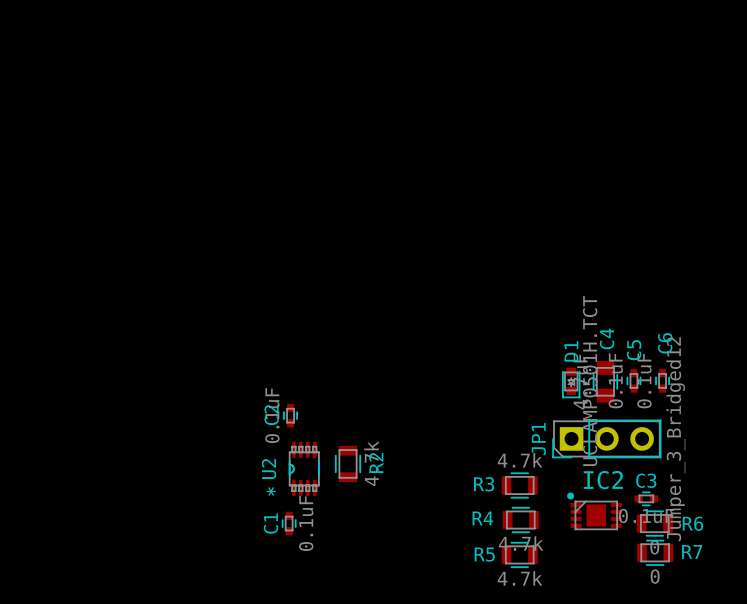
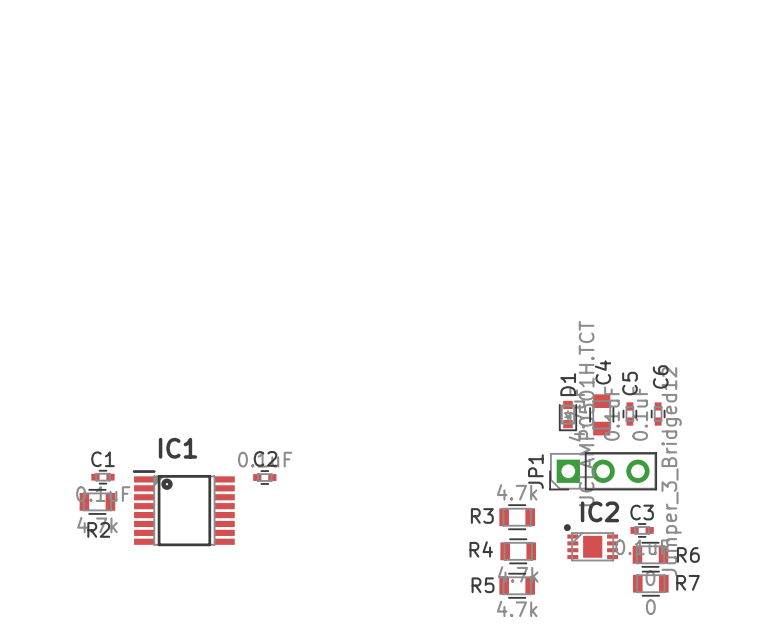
C2 rotation: 0° (290, 415) -> 90° clockwise (264, 477)
C2 position: (290, 415) -> (264, 477)
R2 rotation: 0° (348, 463) -> 90° clockwise (97, 501)
R2 position: (348, 463) -> (97, 501)
U2: (304, 468) -> none
IC1: none -> (183, 508)
C1 rotation: 0° (289, 523) -> 90° clockwise (102, 477)
C1 position: (289, 523) -> (102, 477)

